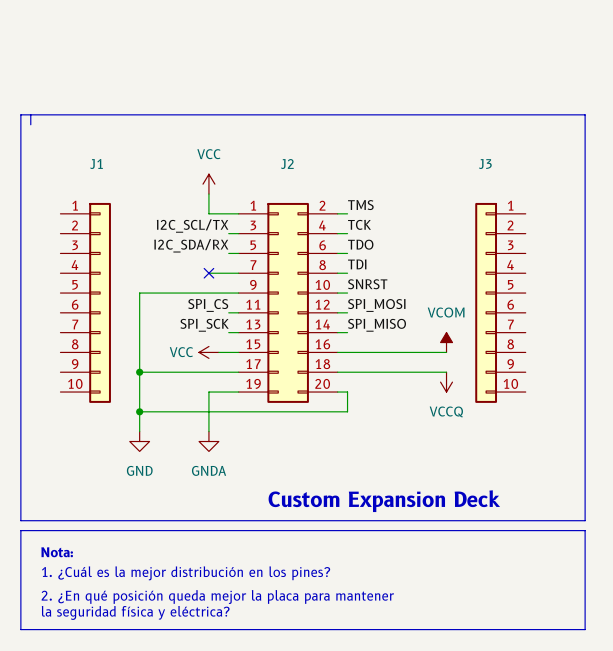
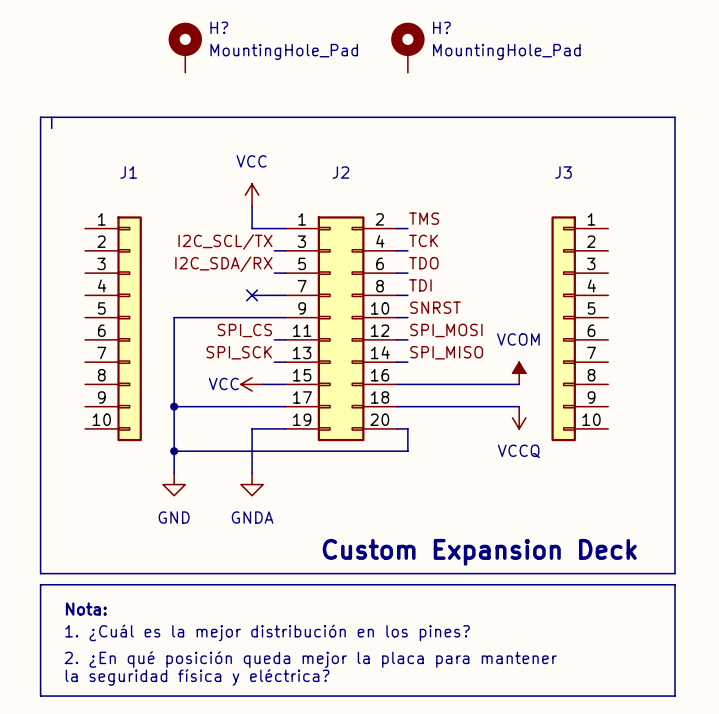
H?: none -> MountingHole_Pad (185, 47)
H?: none -> MountingHole_Pad (407, 47)

